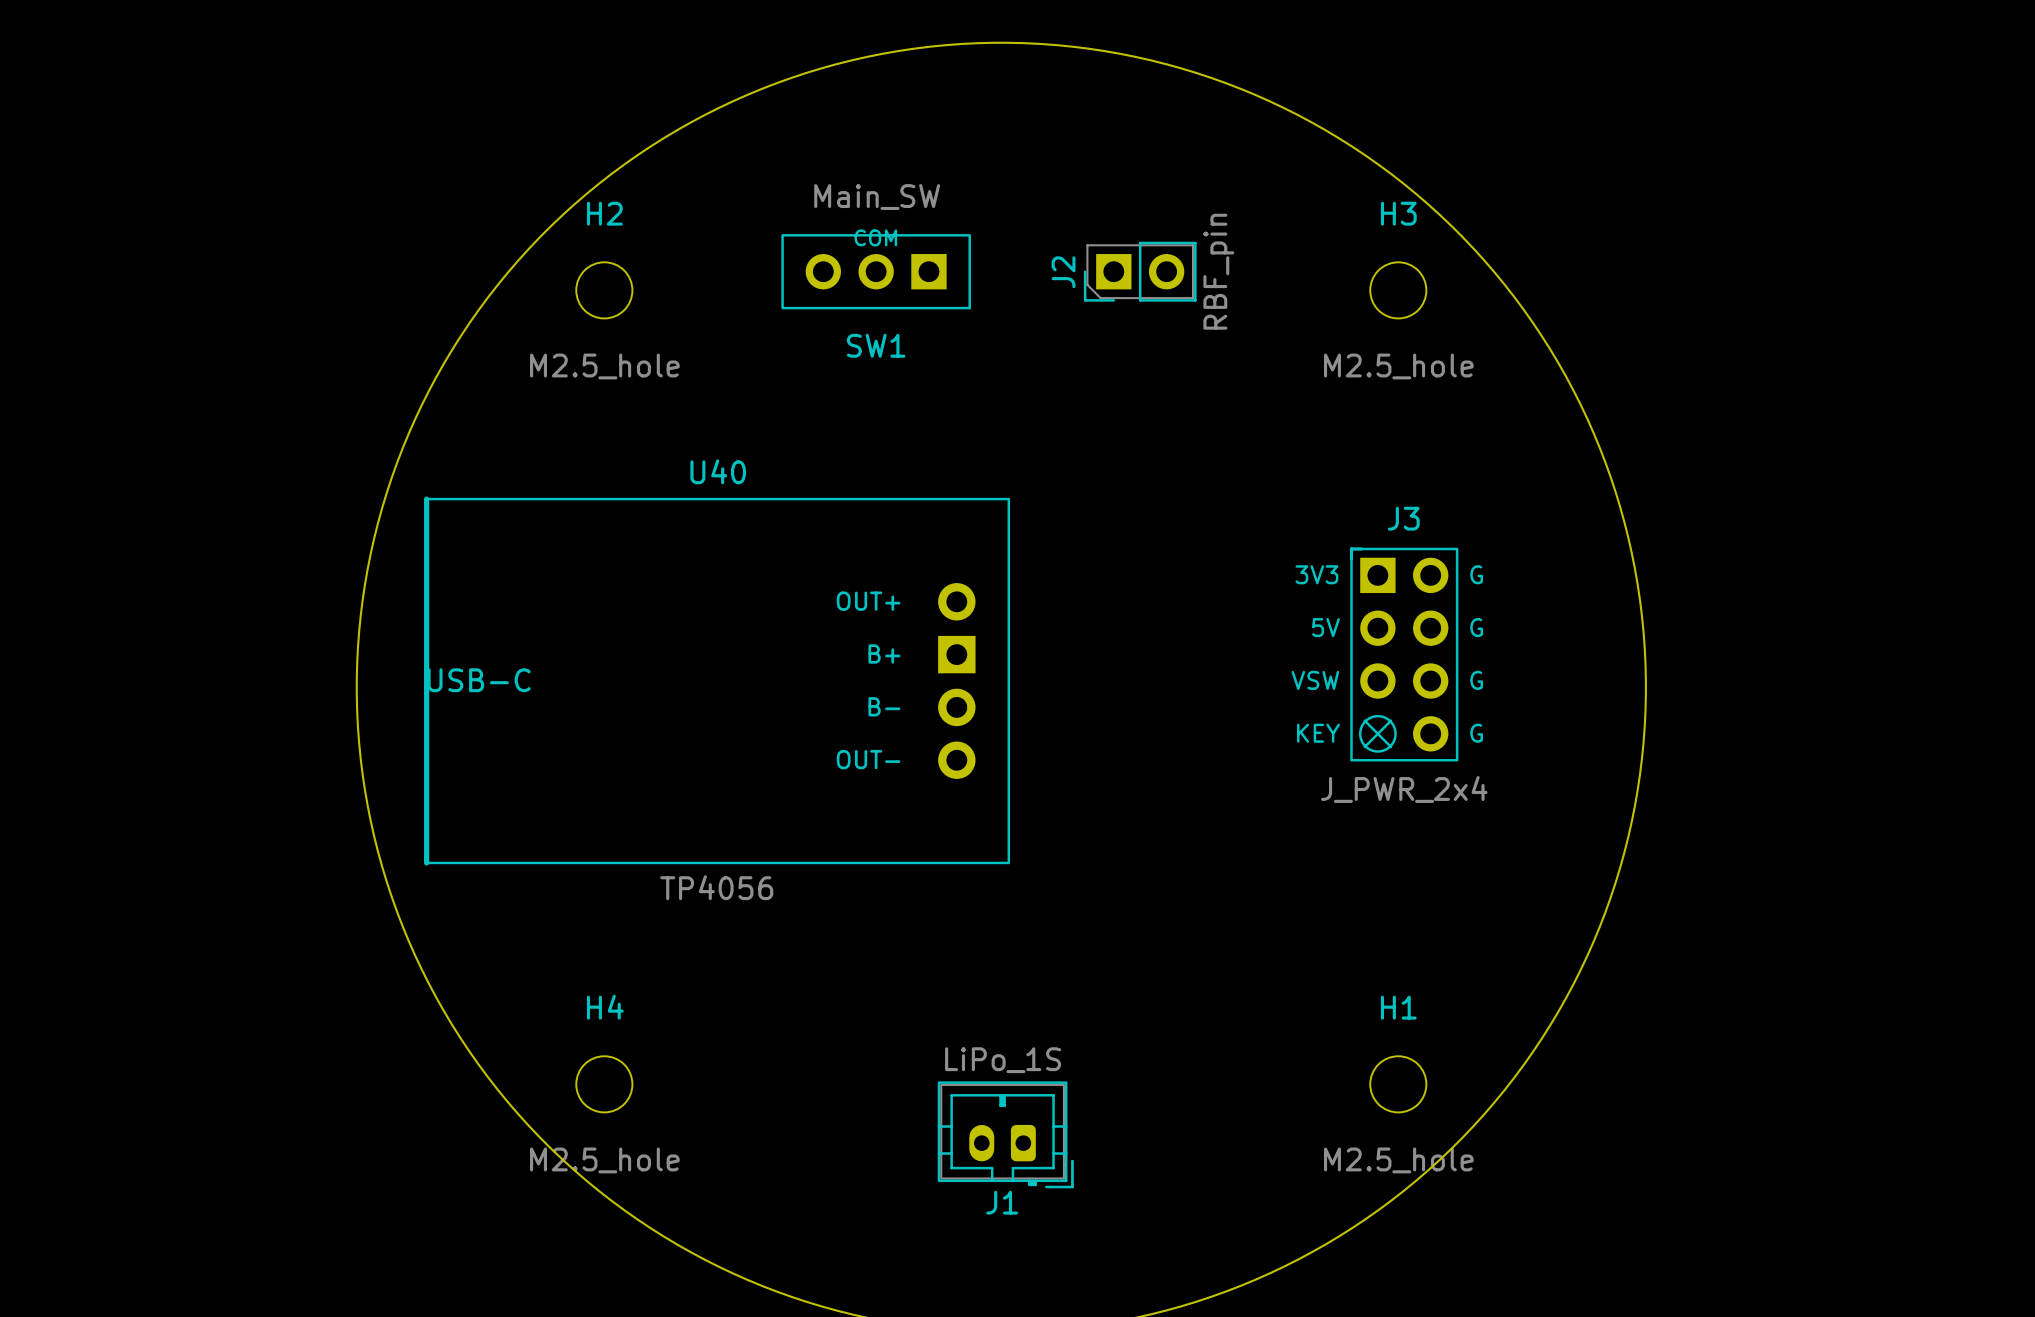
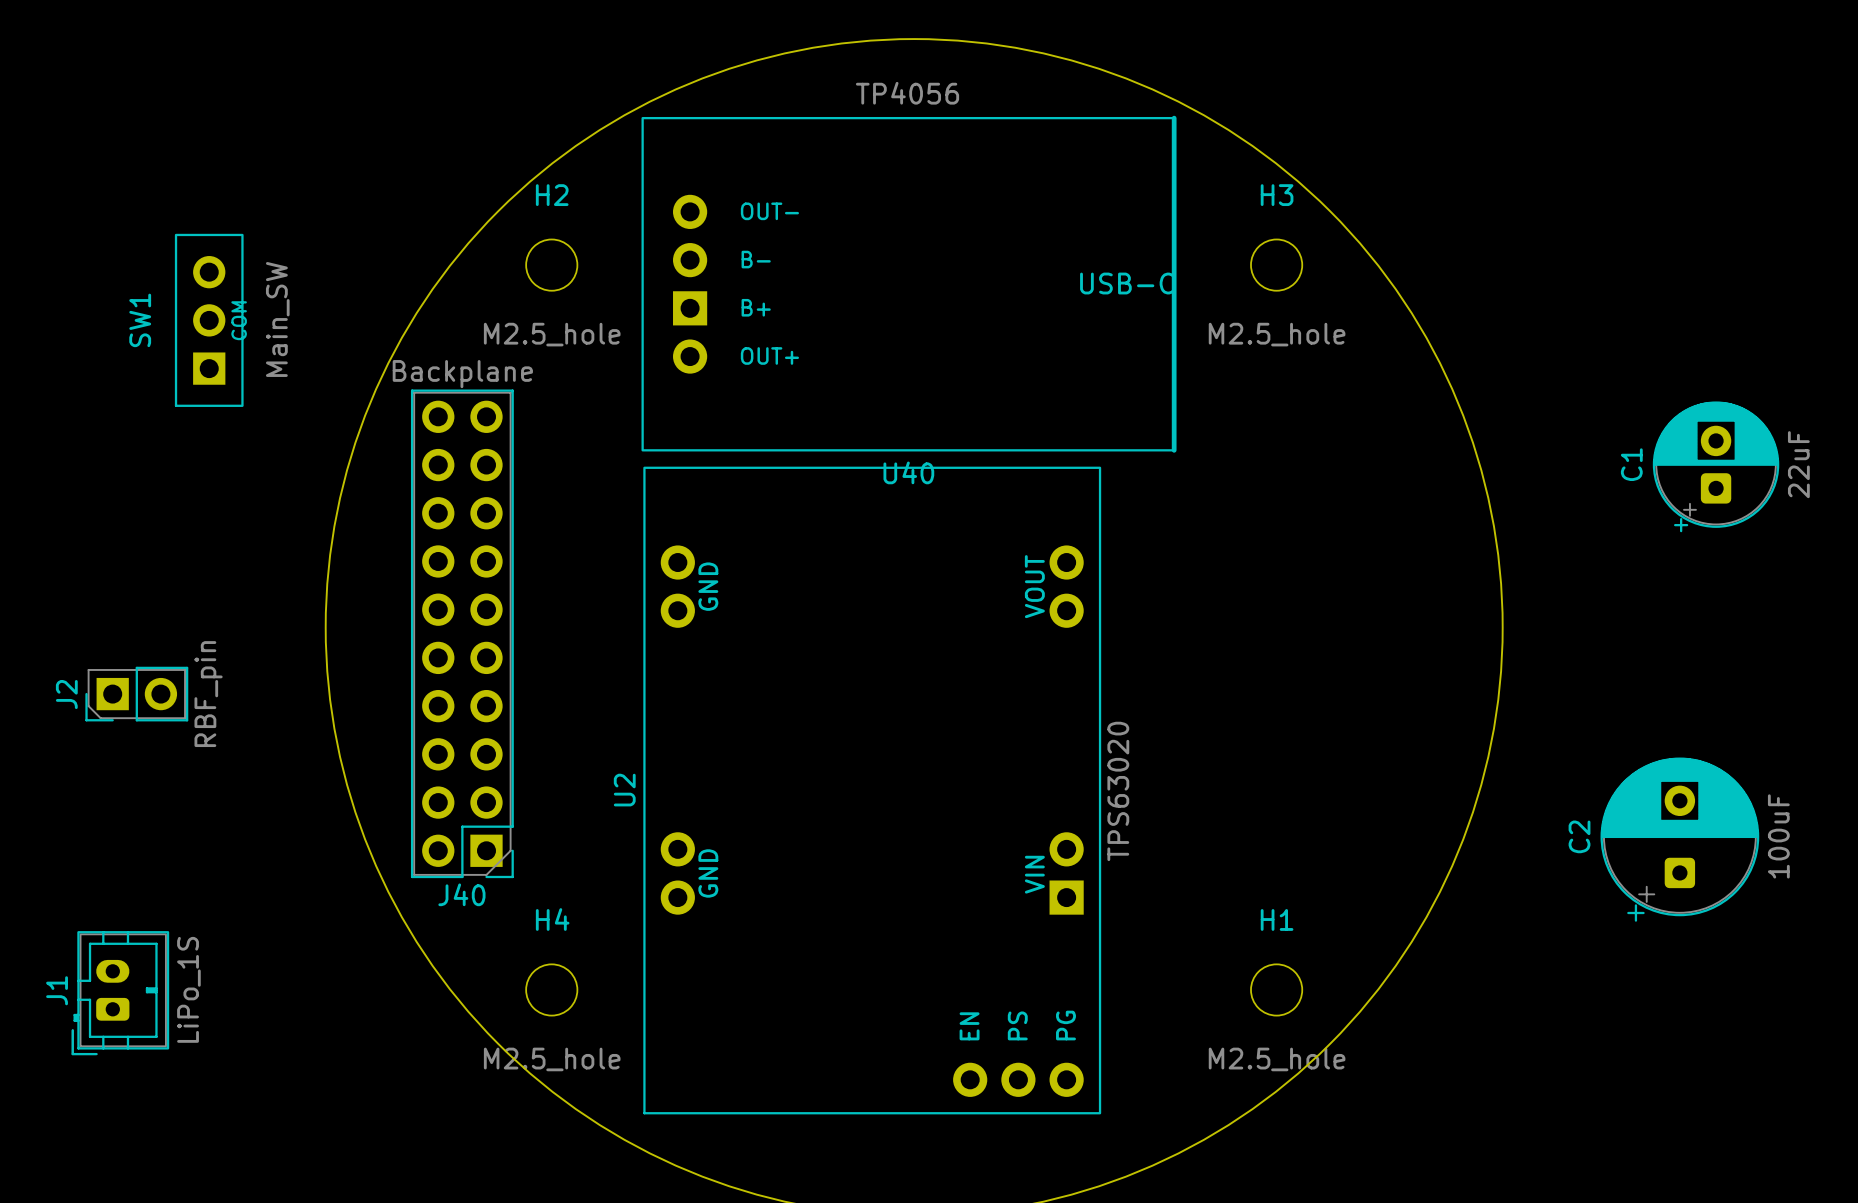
SW1 rotation: 0° (876, 271) -> 90° clockwise (209, 320)
SW1 position: (876, 271) -> (209, 320)
J2 position: (1140, 271) -> (136, 694)
C1: none -> 22uF (1716, 466)
J3: J_PWR_2x4 (1404, 654) -> none
U40 rotation: 0° (717, 681) -> 180° (909, 284)
U40 position: (717, 681) -> (909, 284)
J40: none -> Backplane (462, 633)
U2: none -> TPS63020 (872, 790)
C2: none -> 100uF (1679, 839)
J1 rotation: 0° (1005, 1134) -> 90° clockwise (120, 993)
J1 position: (1005, 1134) -> (120, 993)

